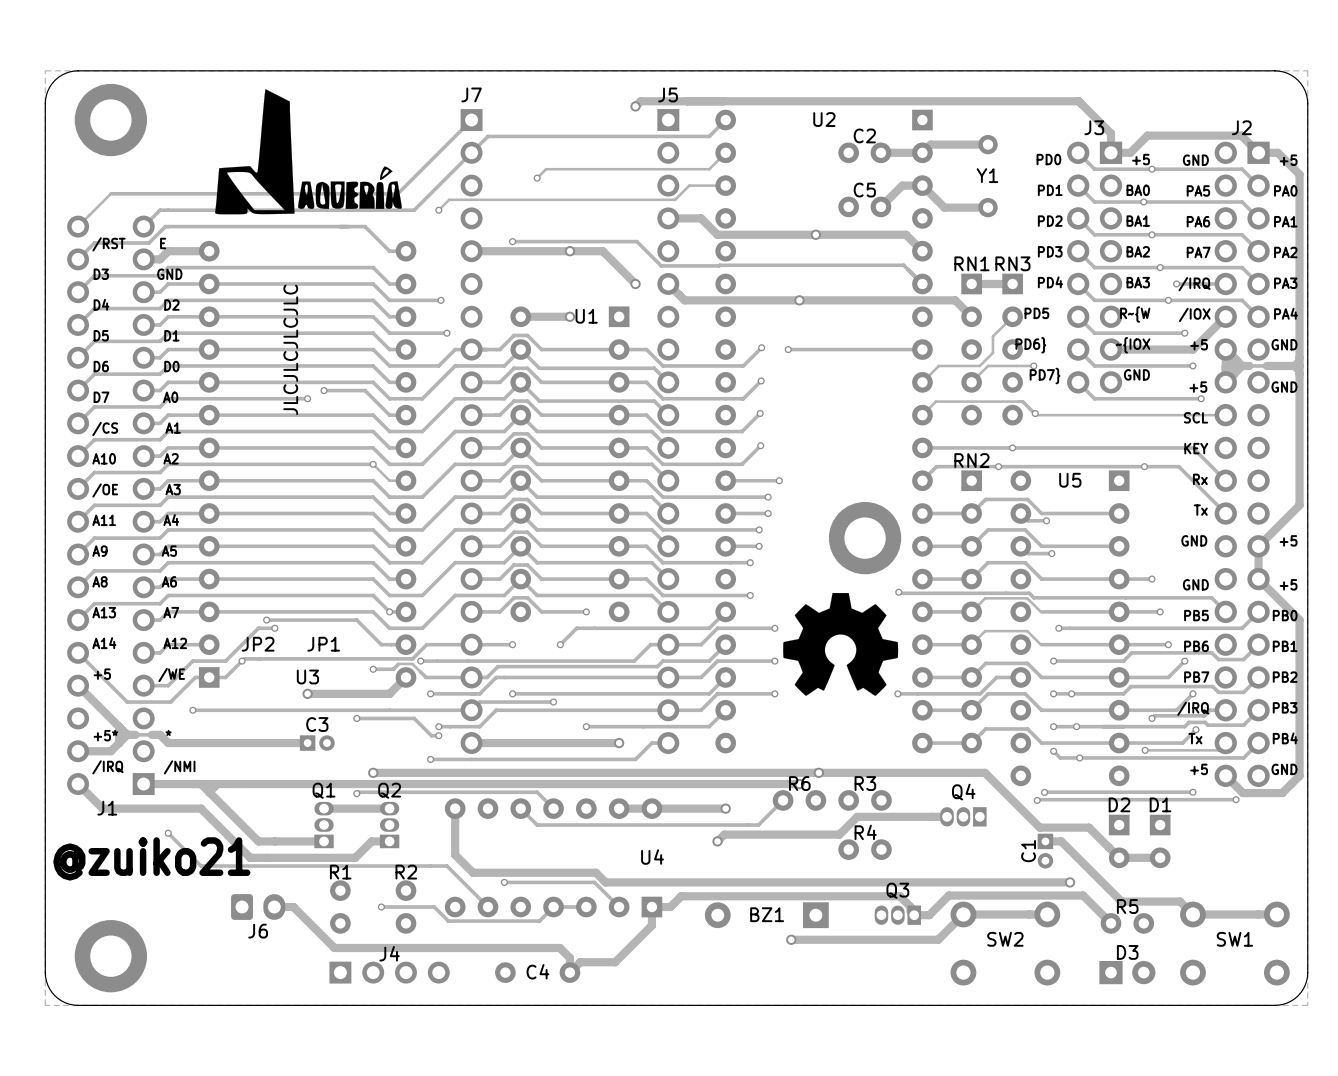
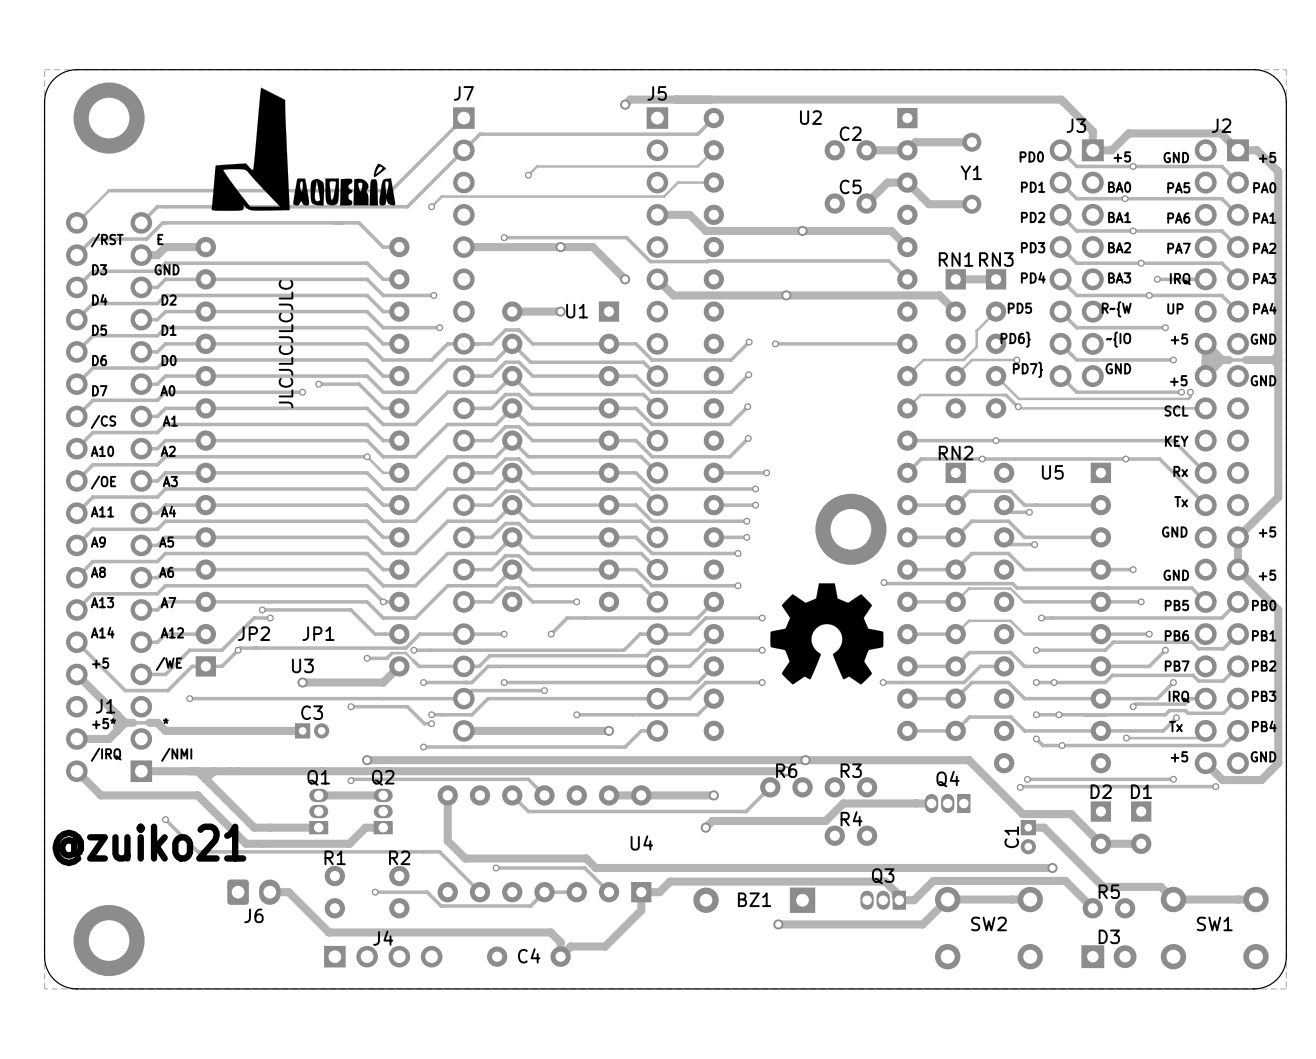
text: /IRQ PA3 (1238, 284) -> IRQ PA3 (1223, 279)
text: /IOX PA4 (1238, 314) -> UP PA4 (1222, 308)
track: (1225, 316) (1192, 349) (1111, 349) -> none
text: PD6} ~{IOX (1082, 345) -> PD6} ~{IO (1065, 339)
track: none -> (996, 376) (1018, 398) (1188, 398) (1190, 392)
via: none -> (1190, 392)
text: /IRQ PB3 (1237, 708) -> IRQ PB3 (1222, 696)
J1 name position: J1 (107, 808) -> J1 (105, 706)

